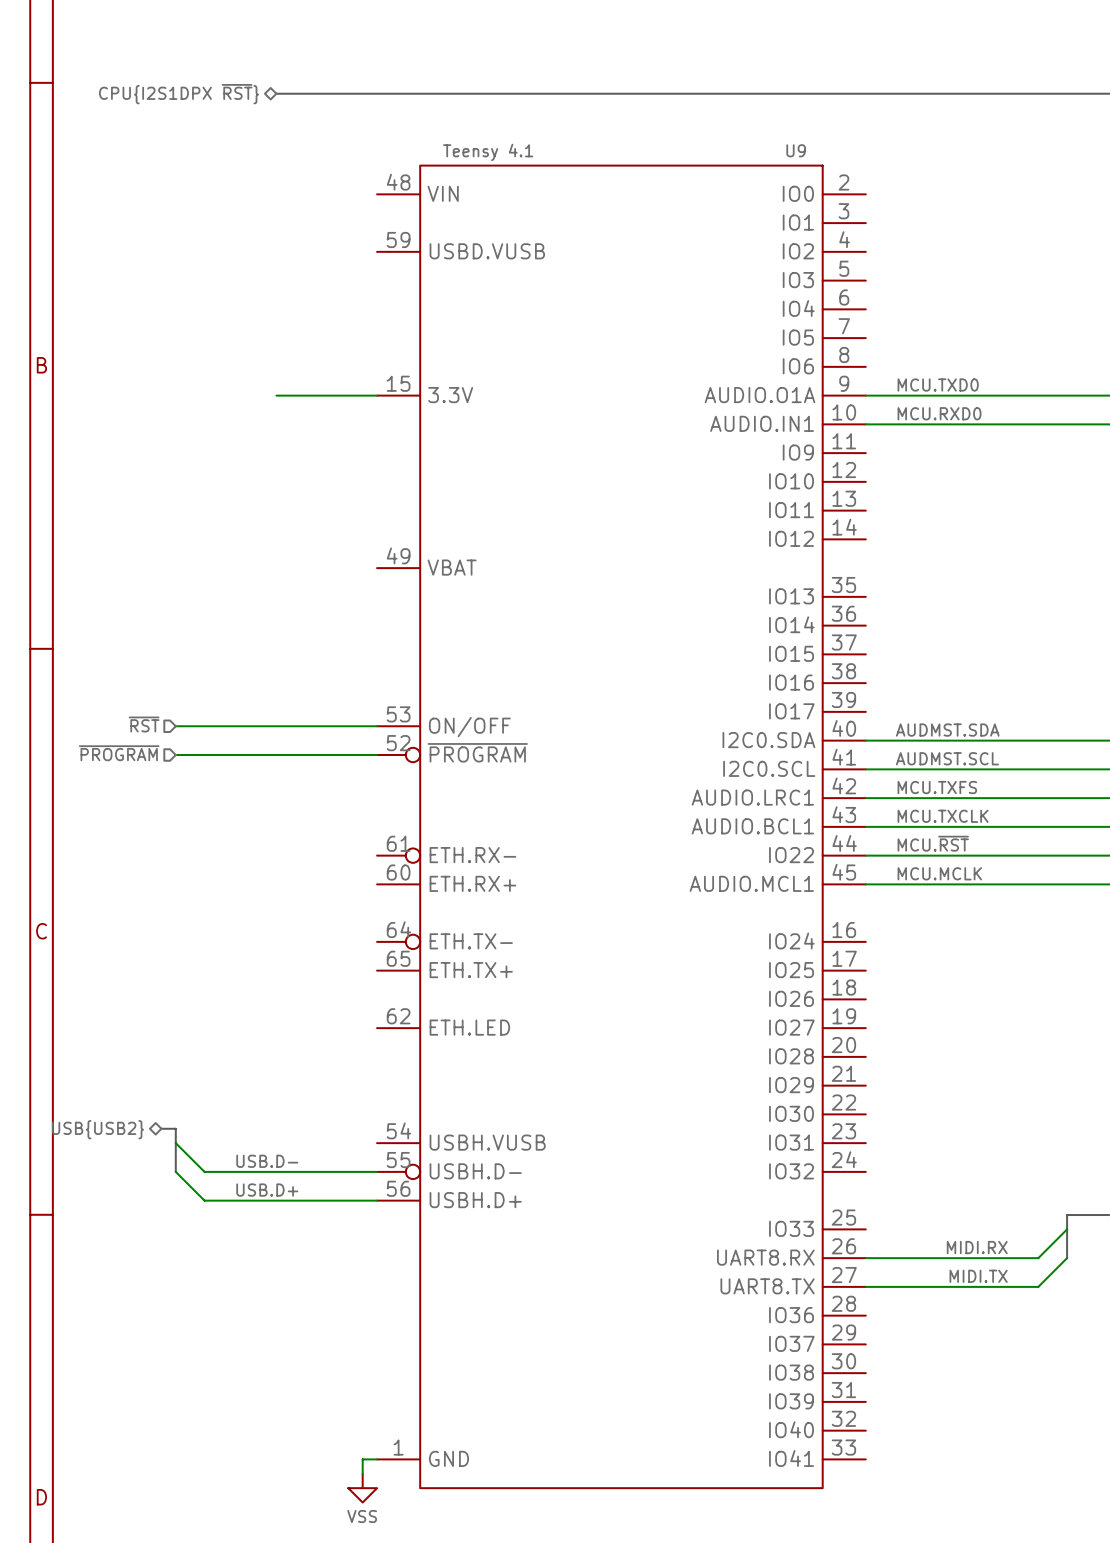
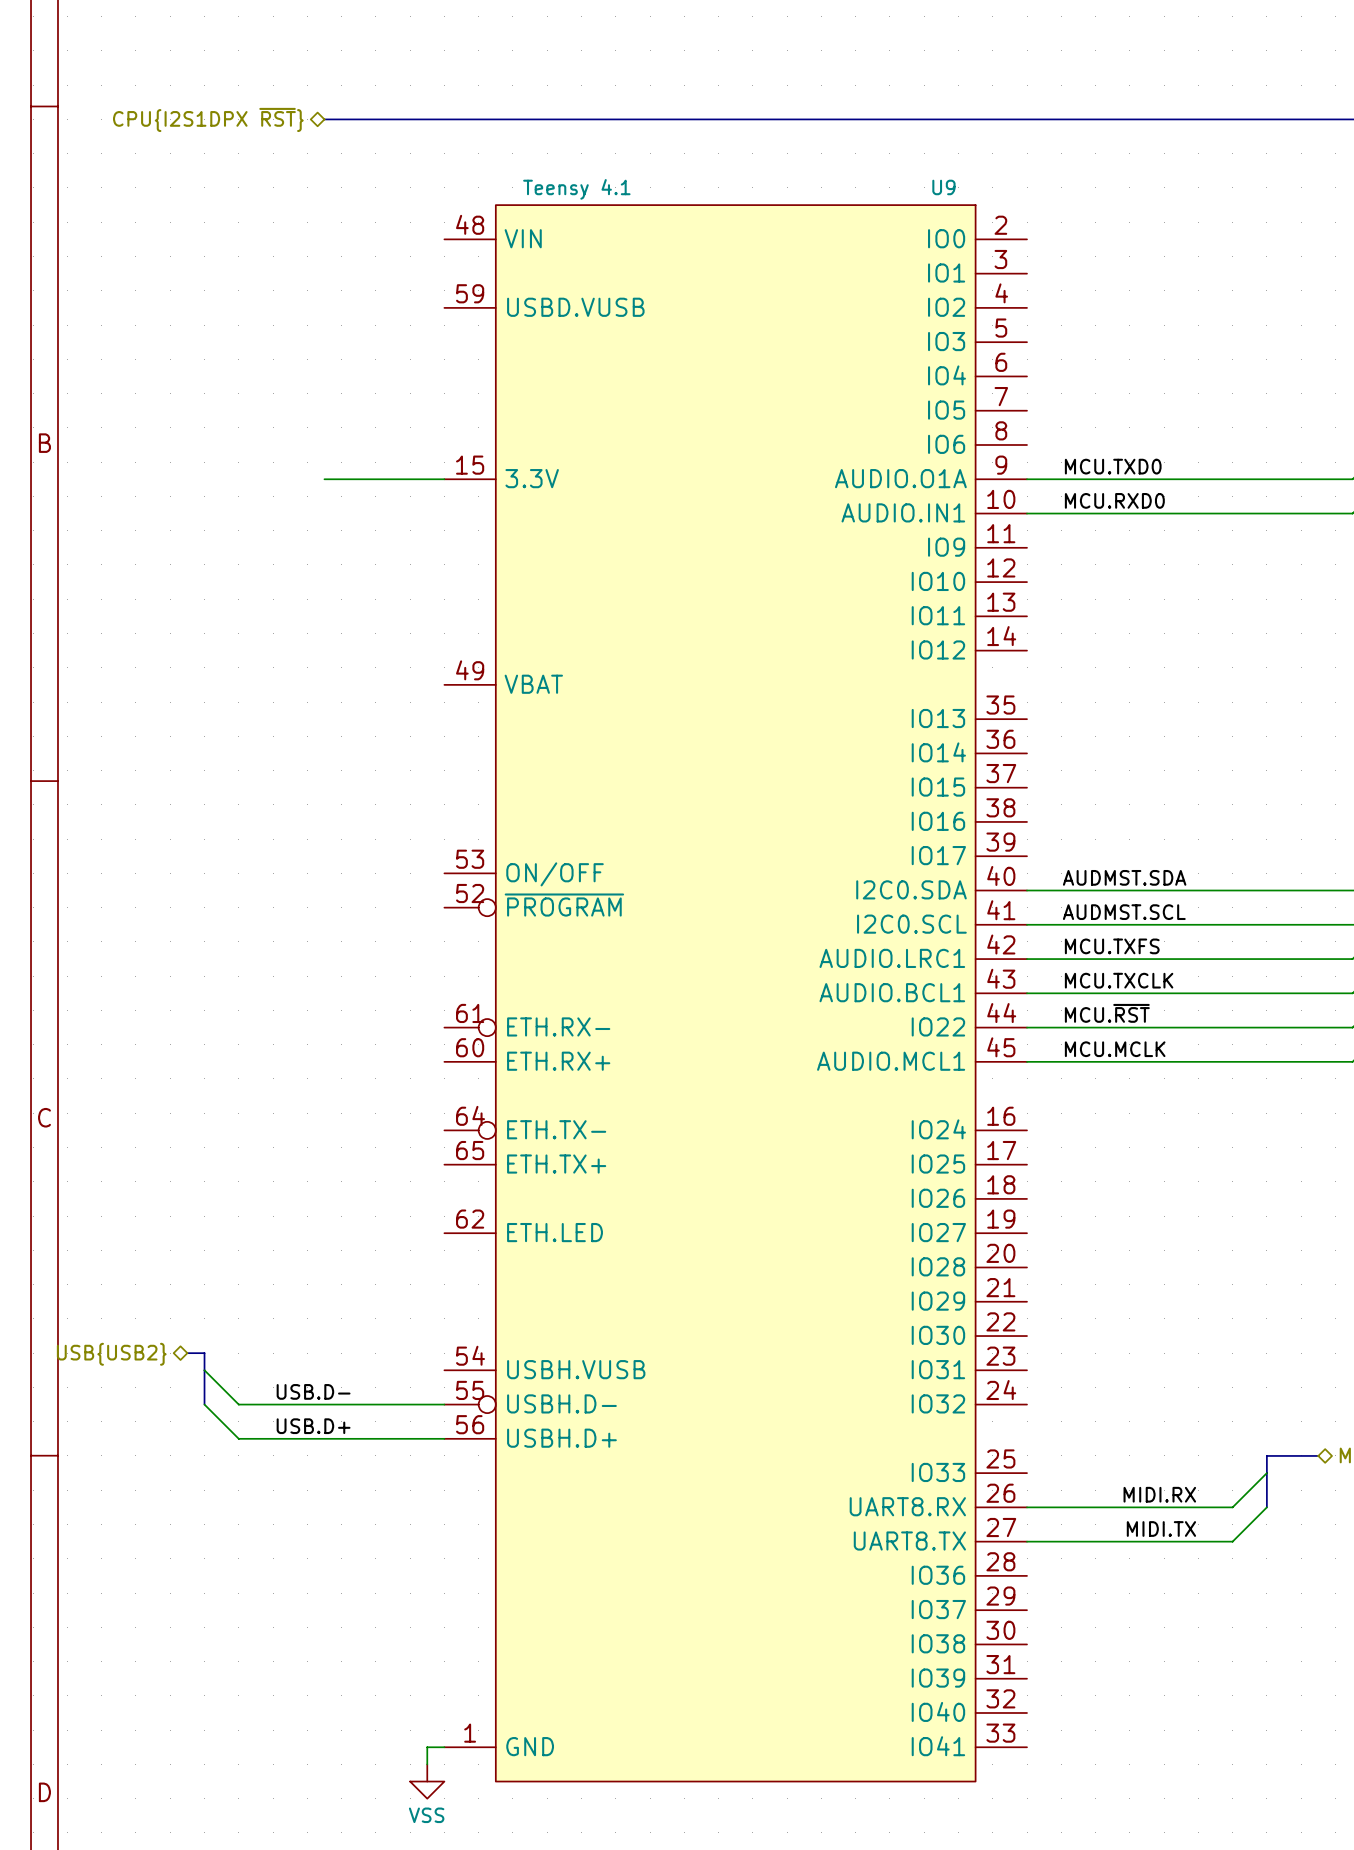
hierarchical label: ~{RST} (144, 724) -> none
wire: (175, 726) (377, 726) -> none
hierarchical label: ~{PROGRAM} (119, 753) -> none
wire: (175, 755) (377, 755) -> none

